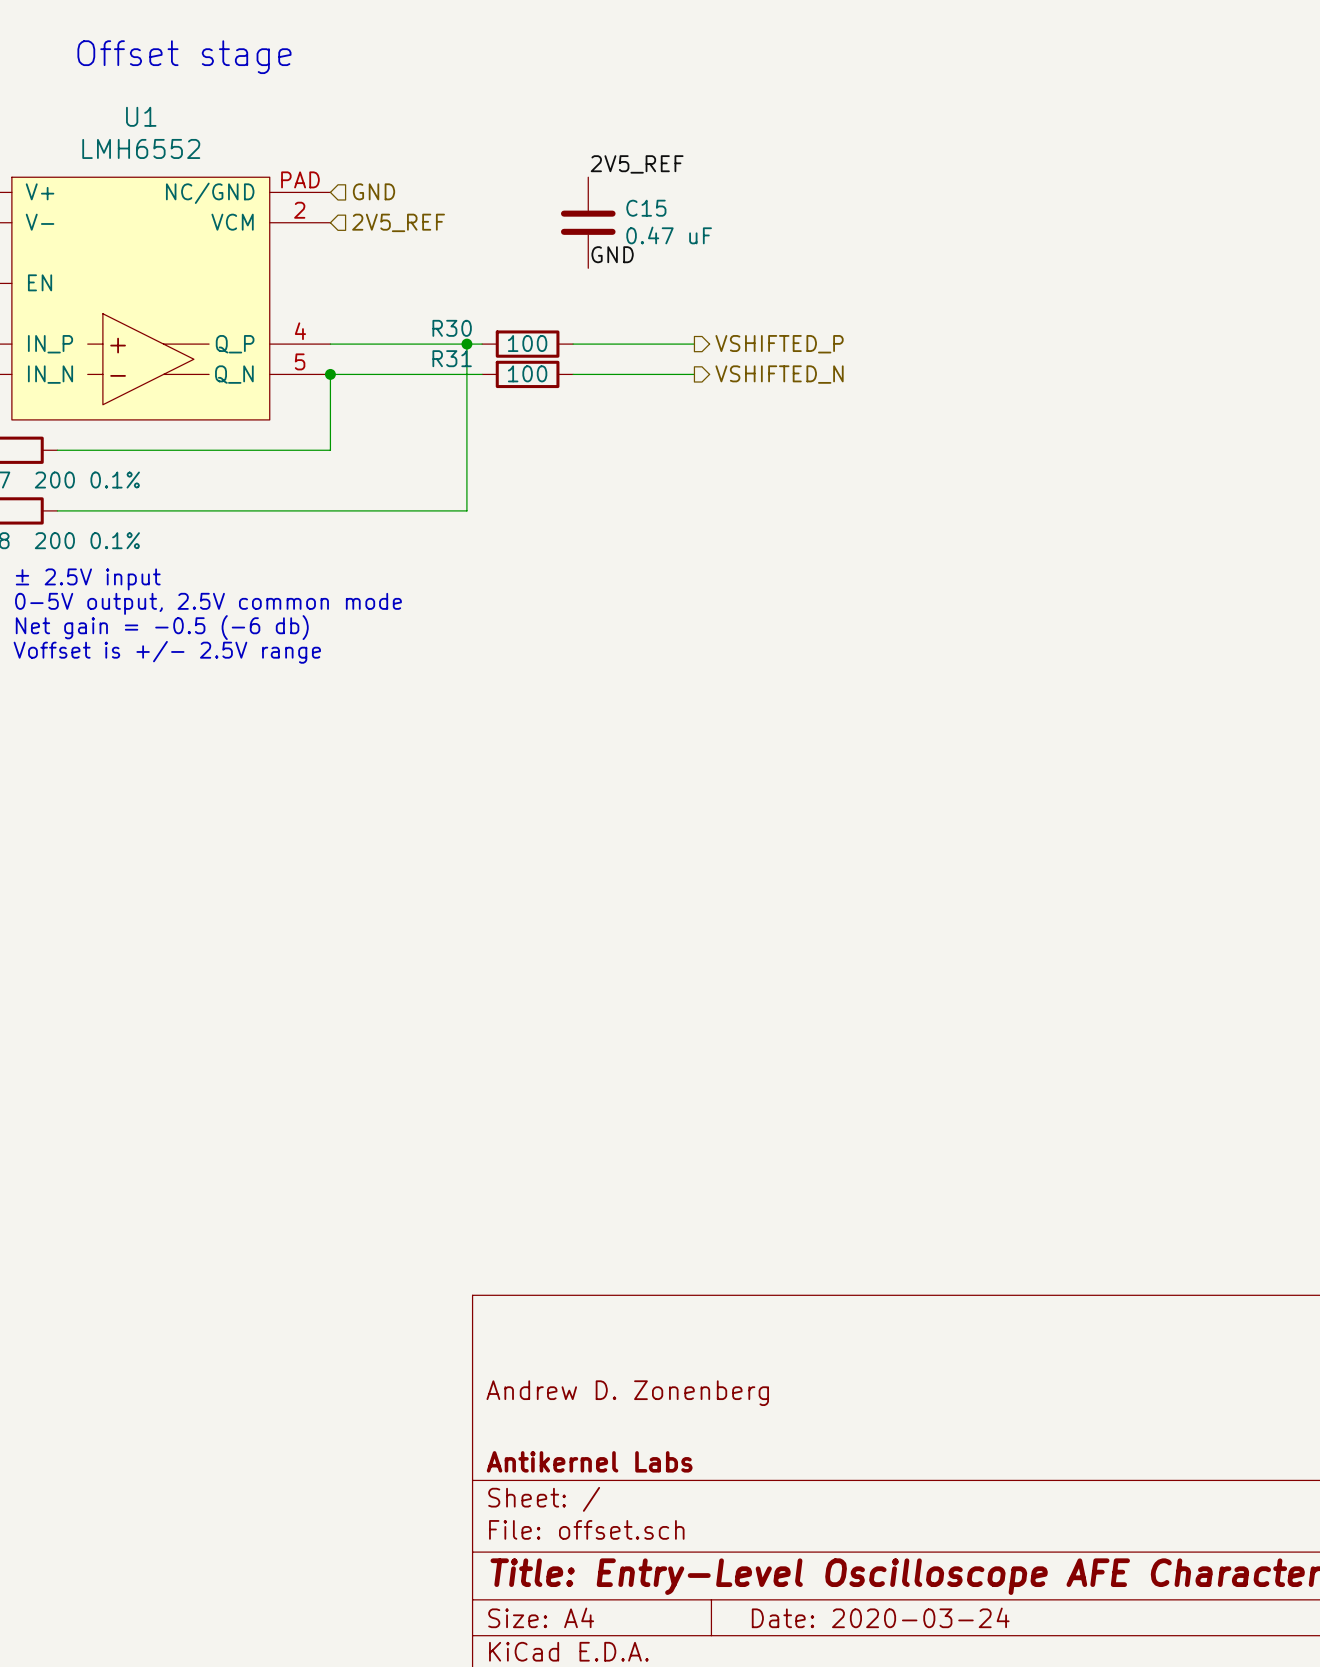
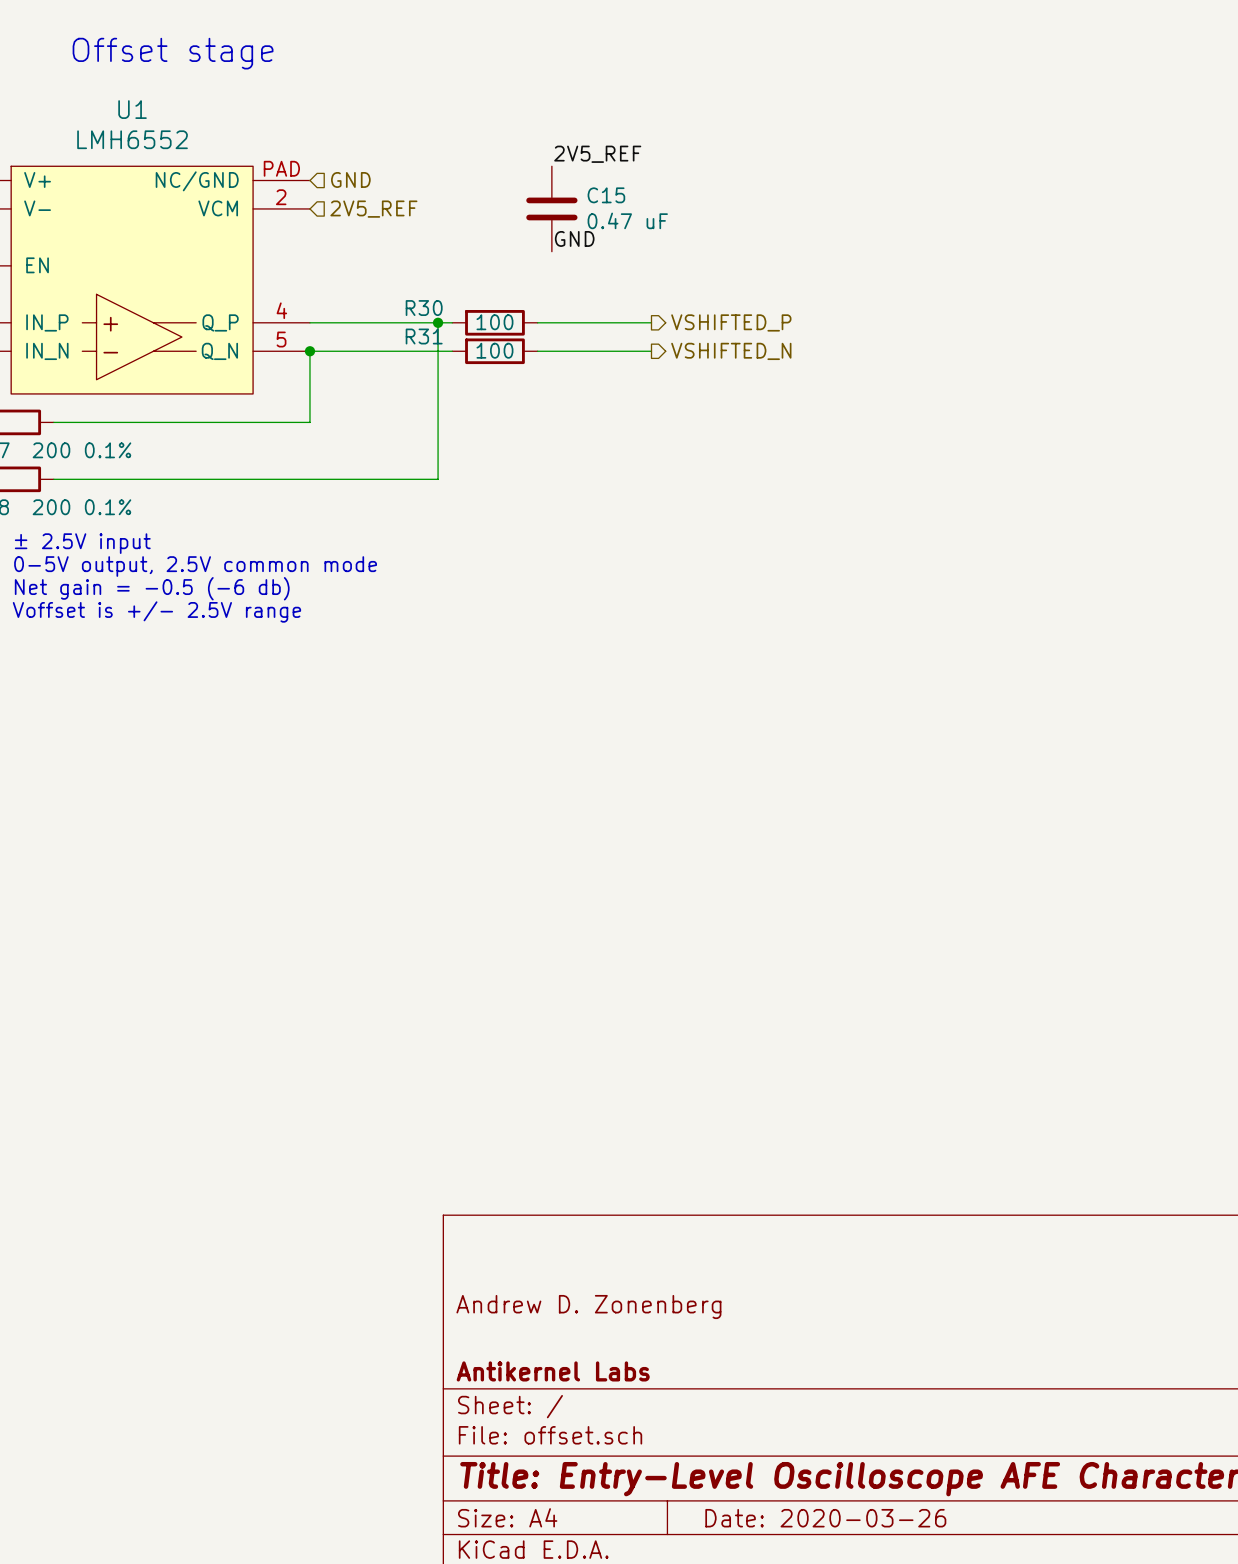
title block: Date: 2020-03-24 (880, 1617) -> Date: 2020-03-26 (825, 1518)

